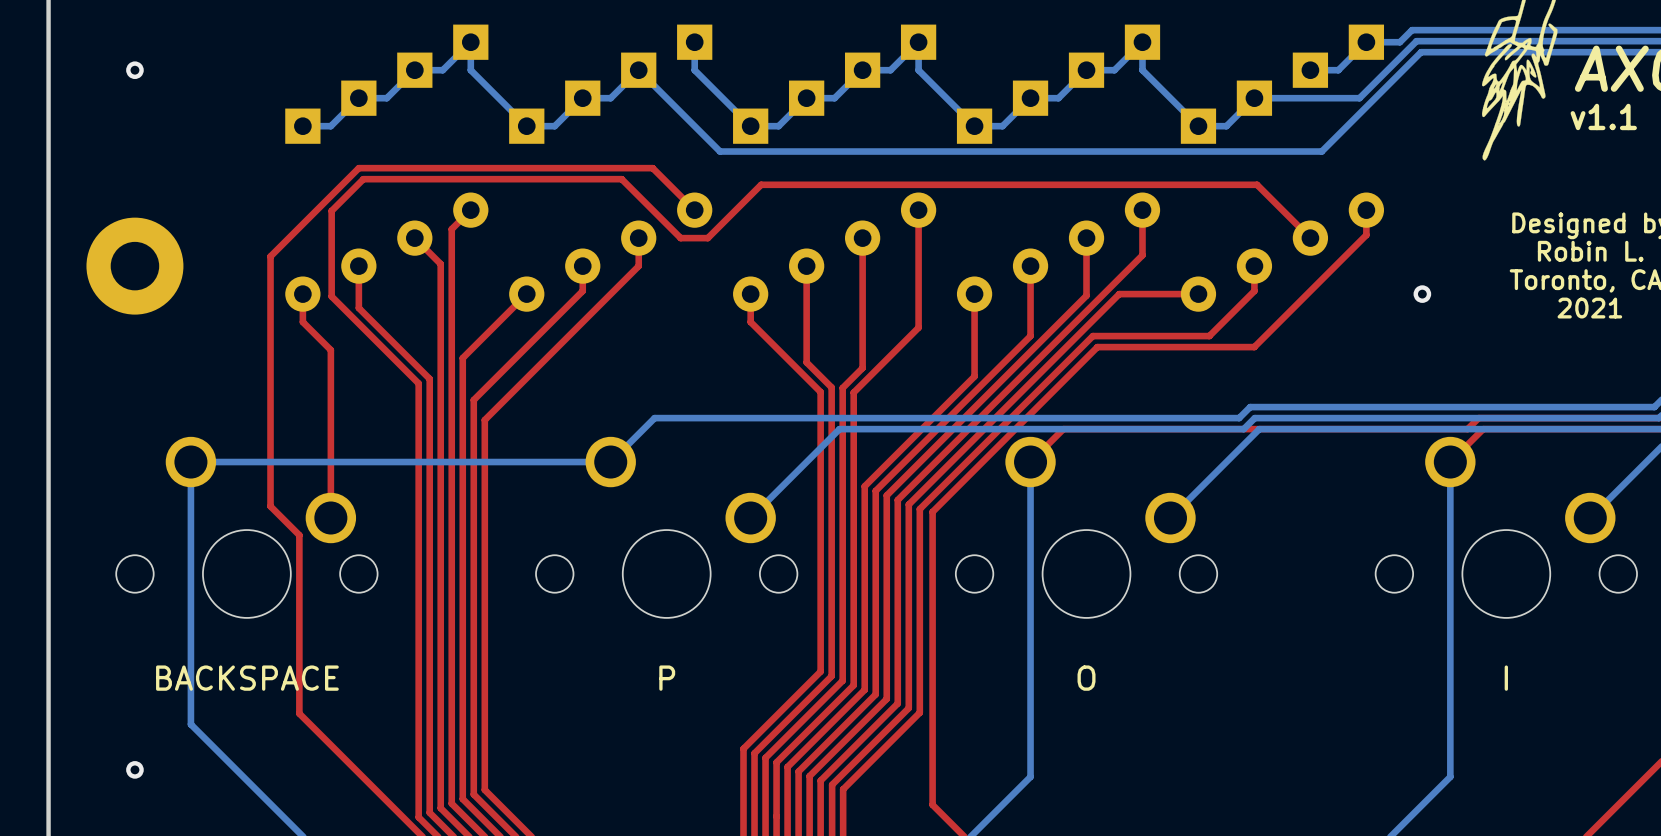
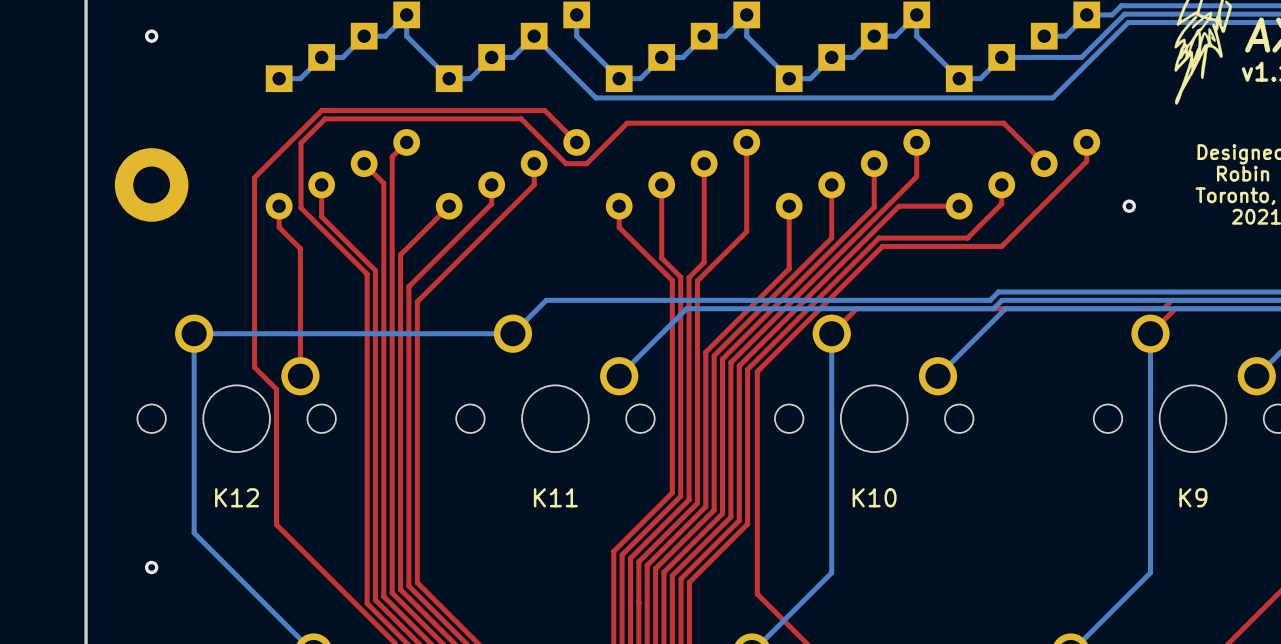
text: BACKSPACE (247, 678) -> K12 (237, 497)
text: P (667, 678) -> K11 (555, 497)
text: O (1086, 678) -> K10 (874, 497)
text: I (1506, 678) -> K9 (1193, 497)

